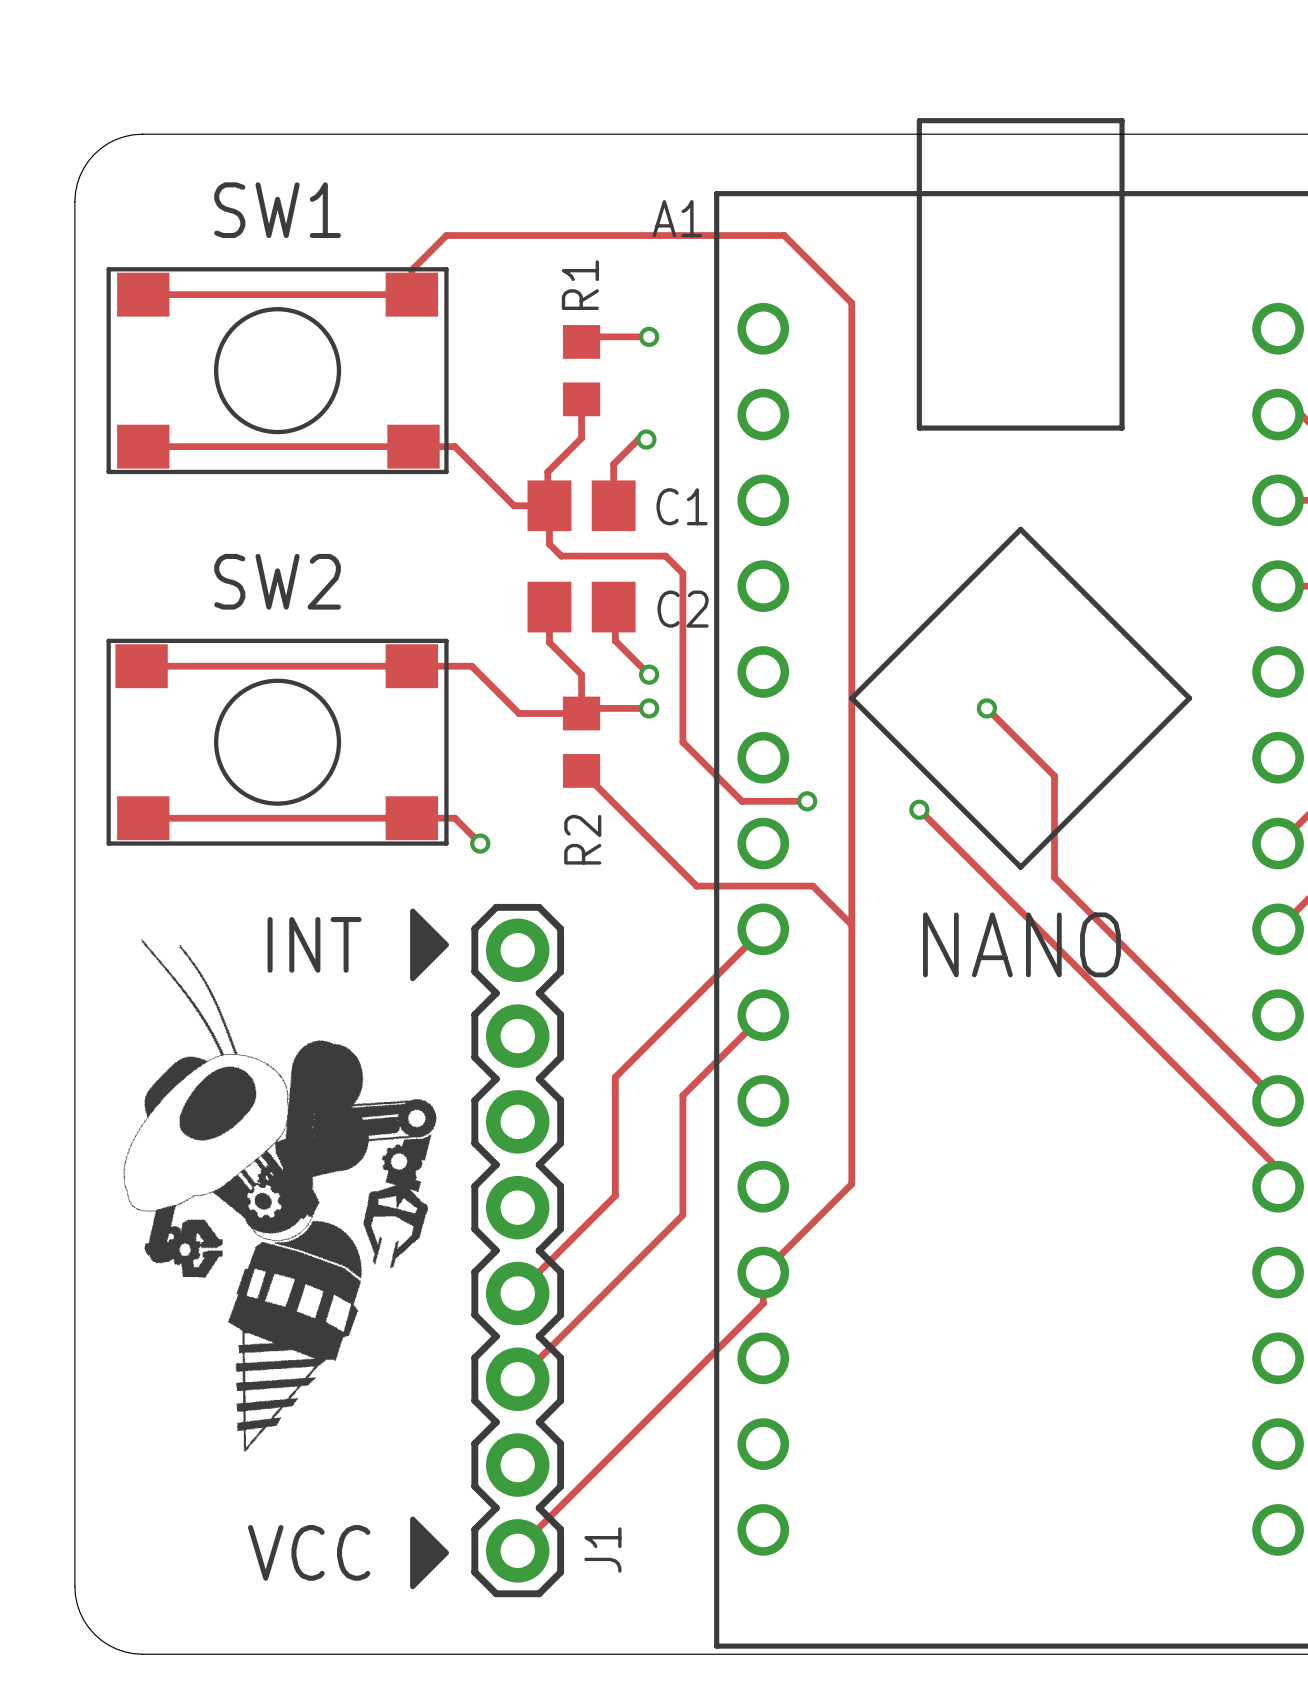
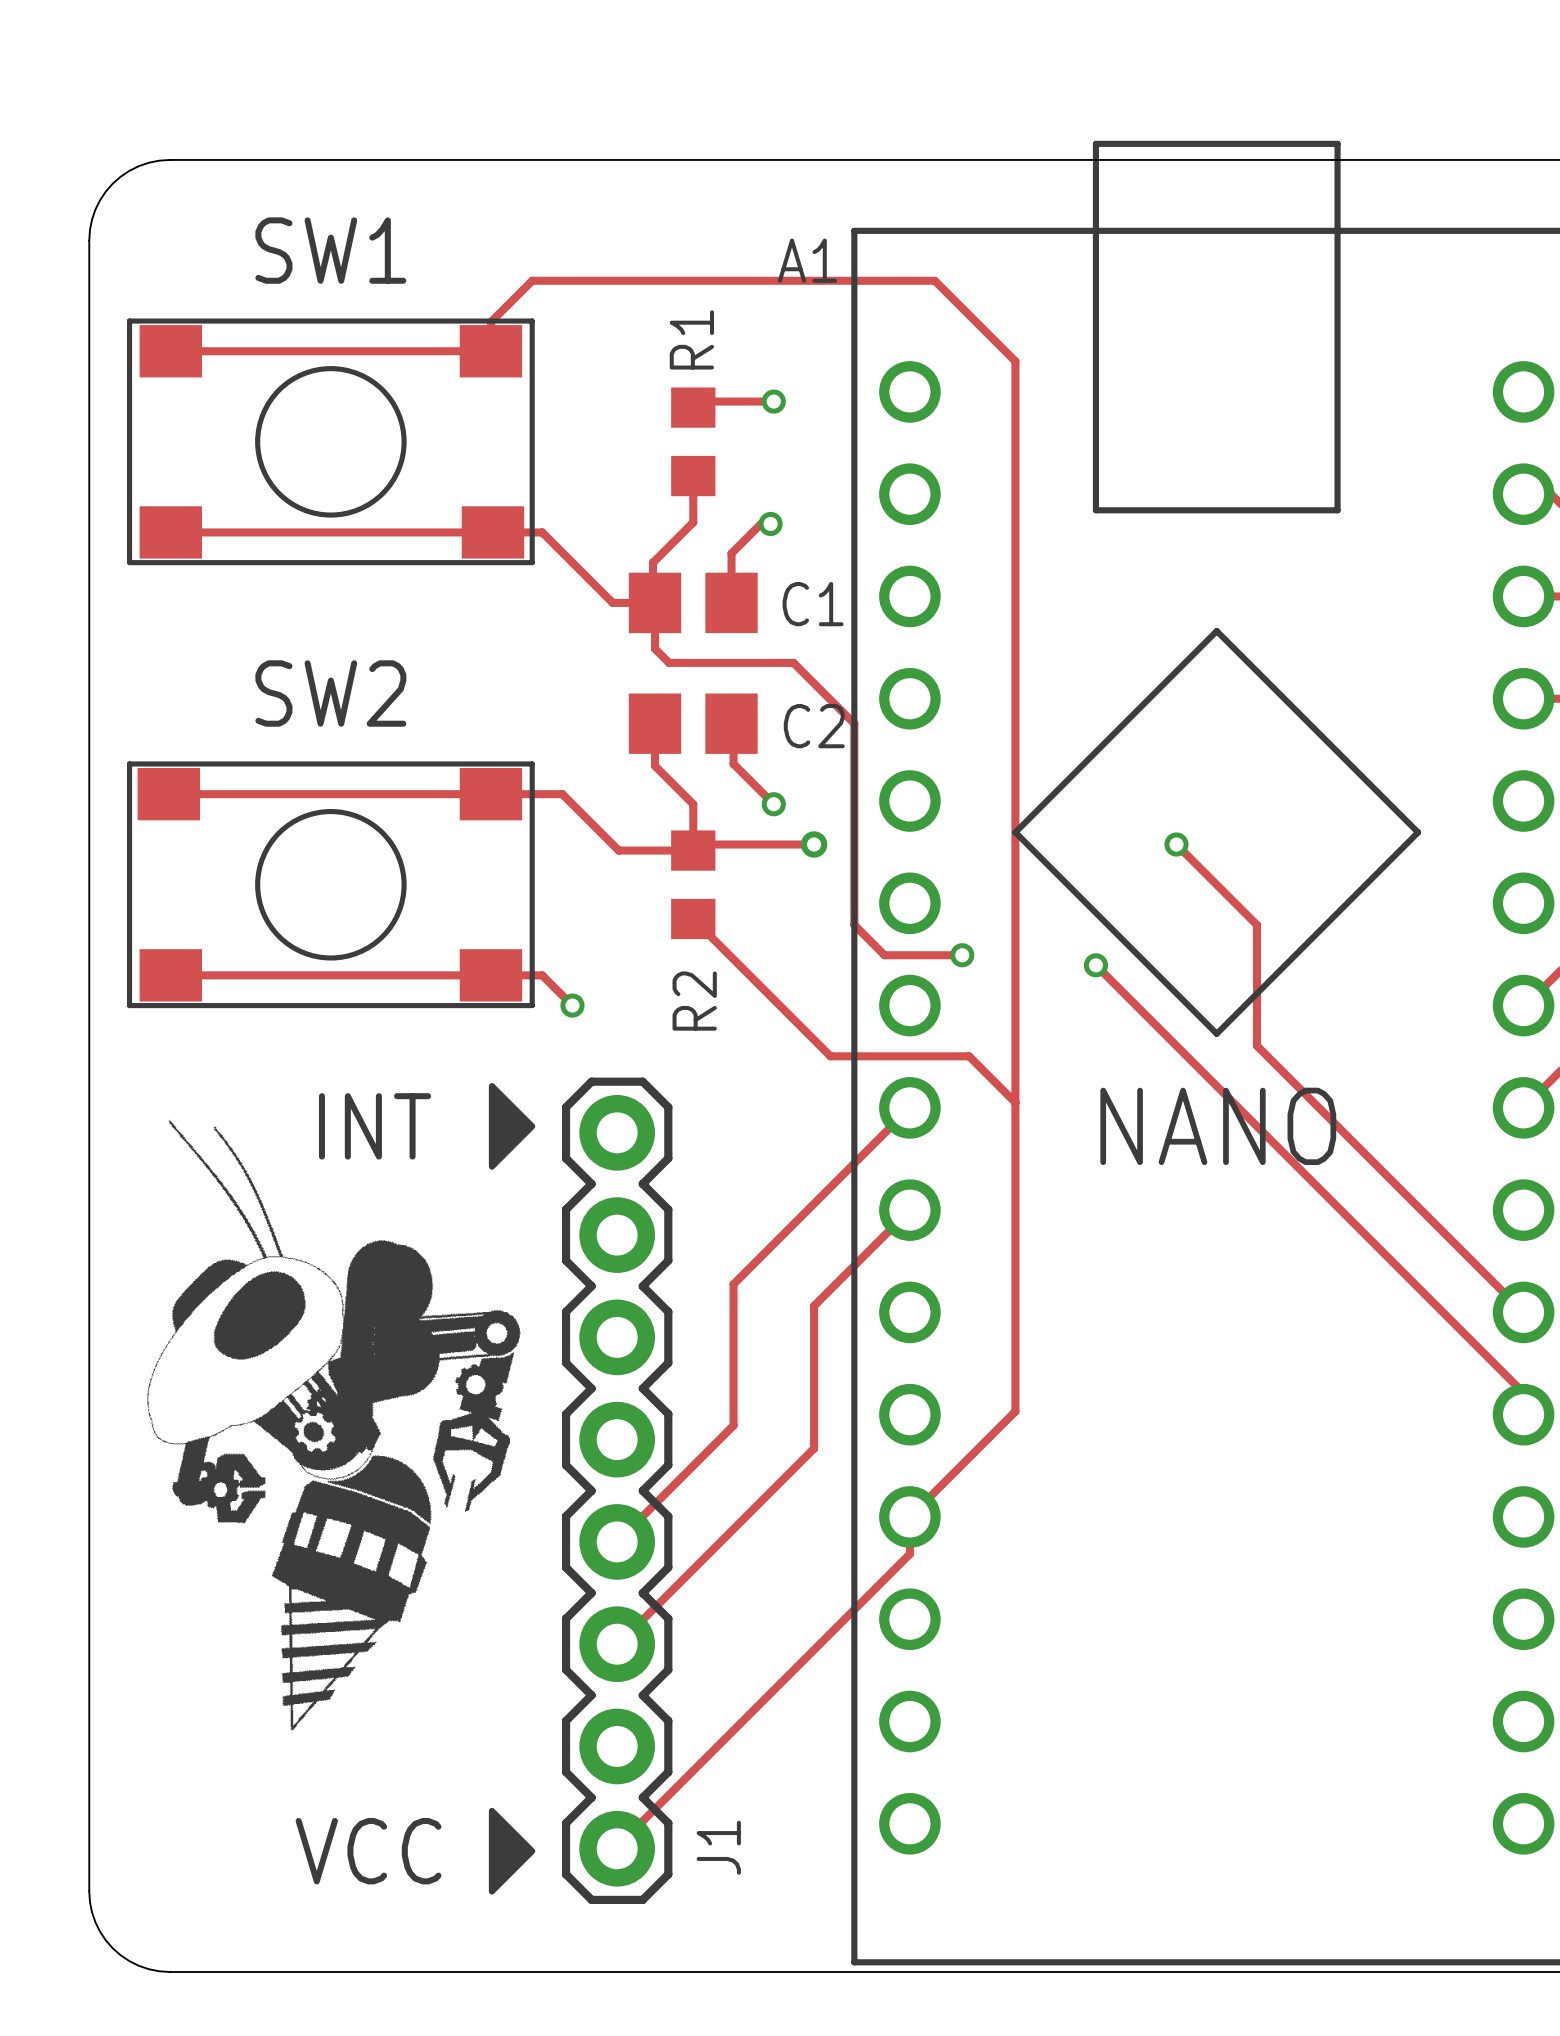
track: (682, 573) (682, 742) (716, 775) -> (814, 683) (854, 723) (854, 925)
track: none -> (773, 844) (814, 844)
via: (649, 708) -> none
via: none -> (814, 844)

